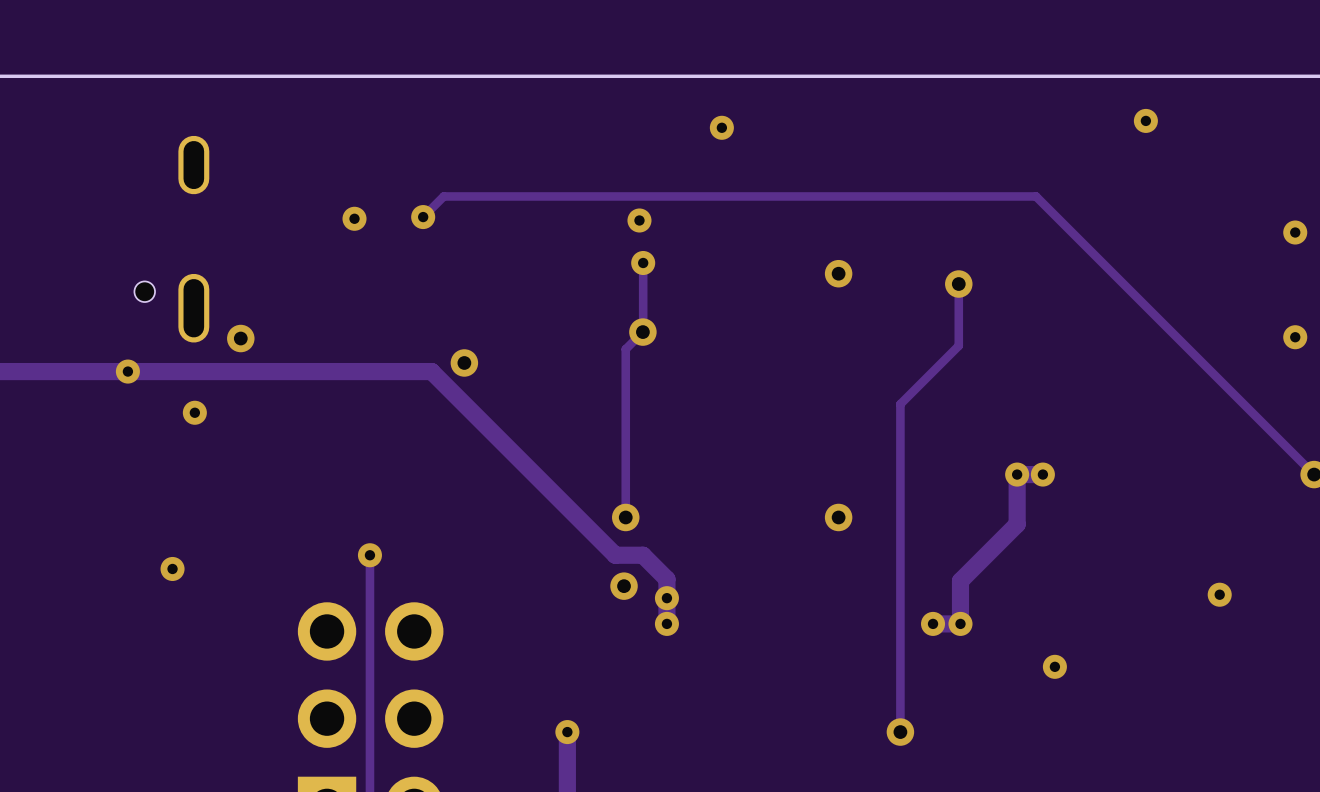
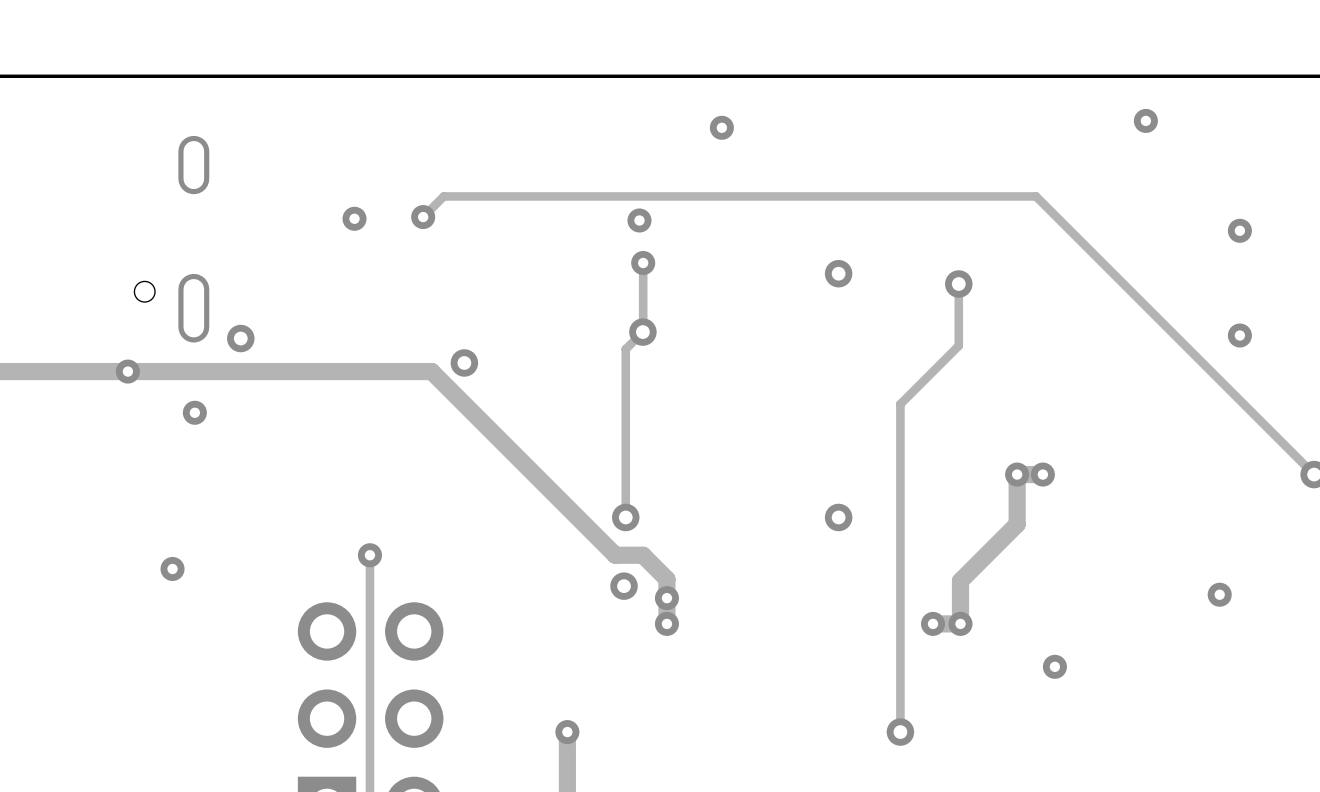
via position: (1295, 232) -> (1239, 230)
via position: (1295, 337) -> (1239, 335)

